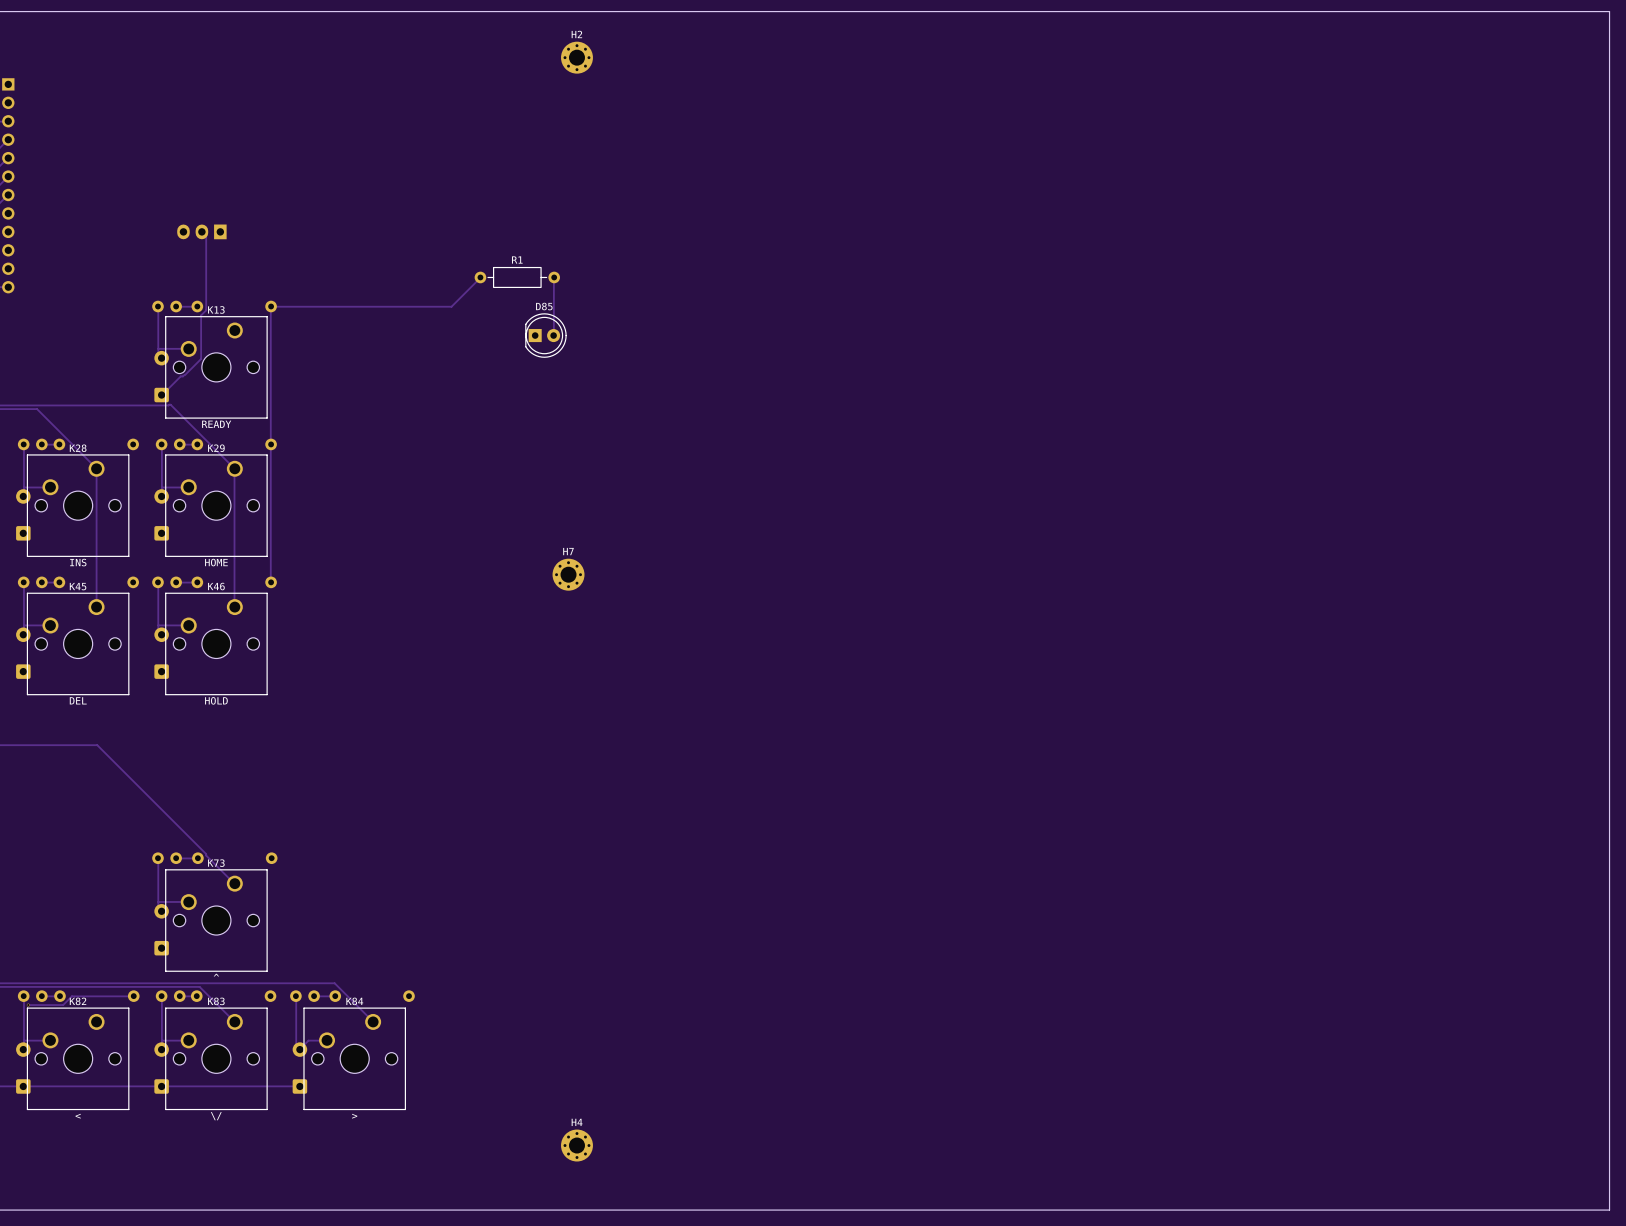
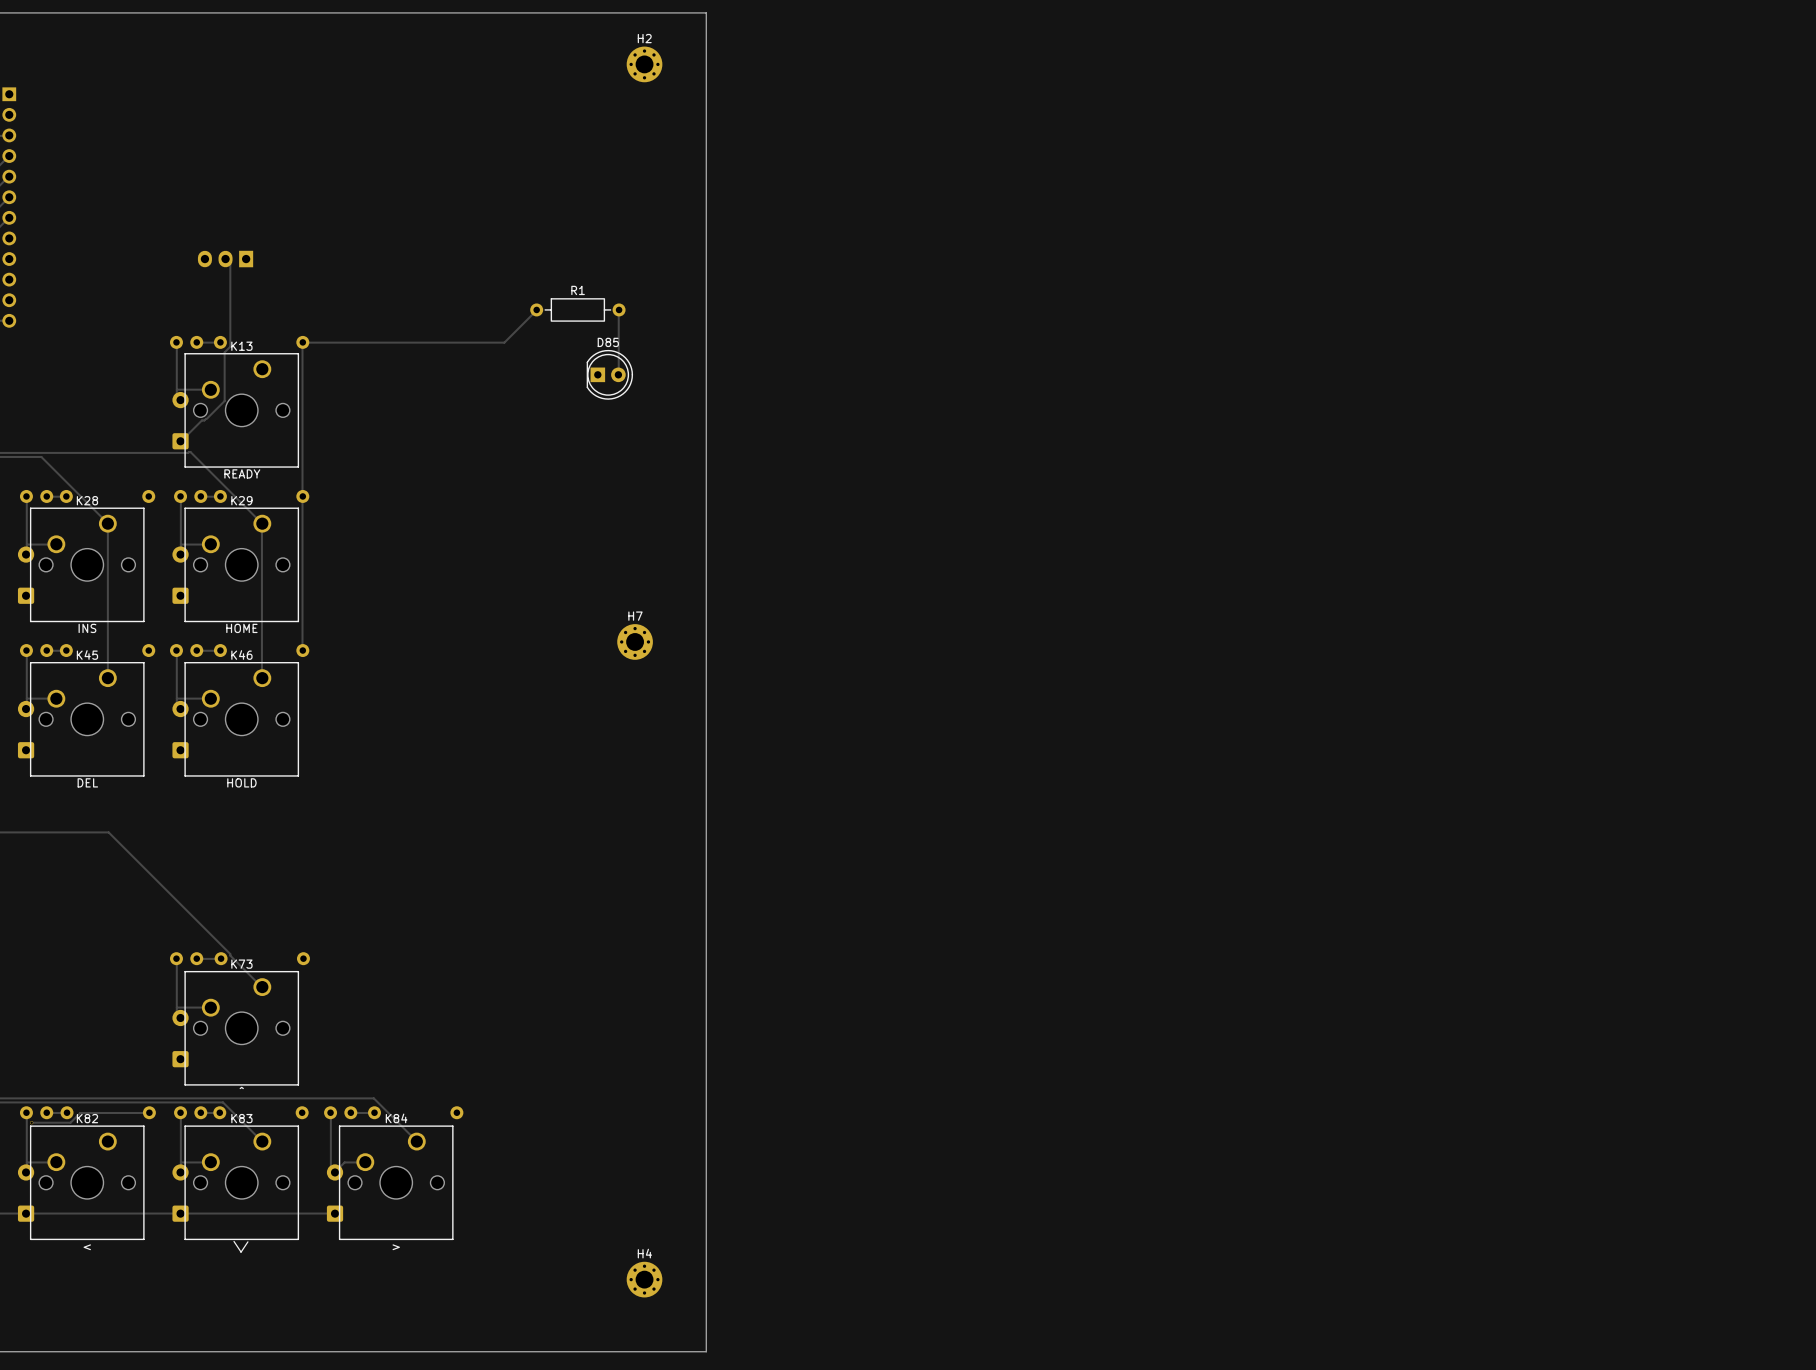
board edge: (632, 11) (1609, 11) (1609, 1210) (632, 1210) -> (706, 12) (706, 1351)

